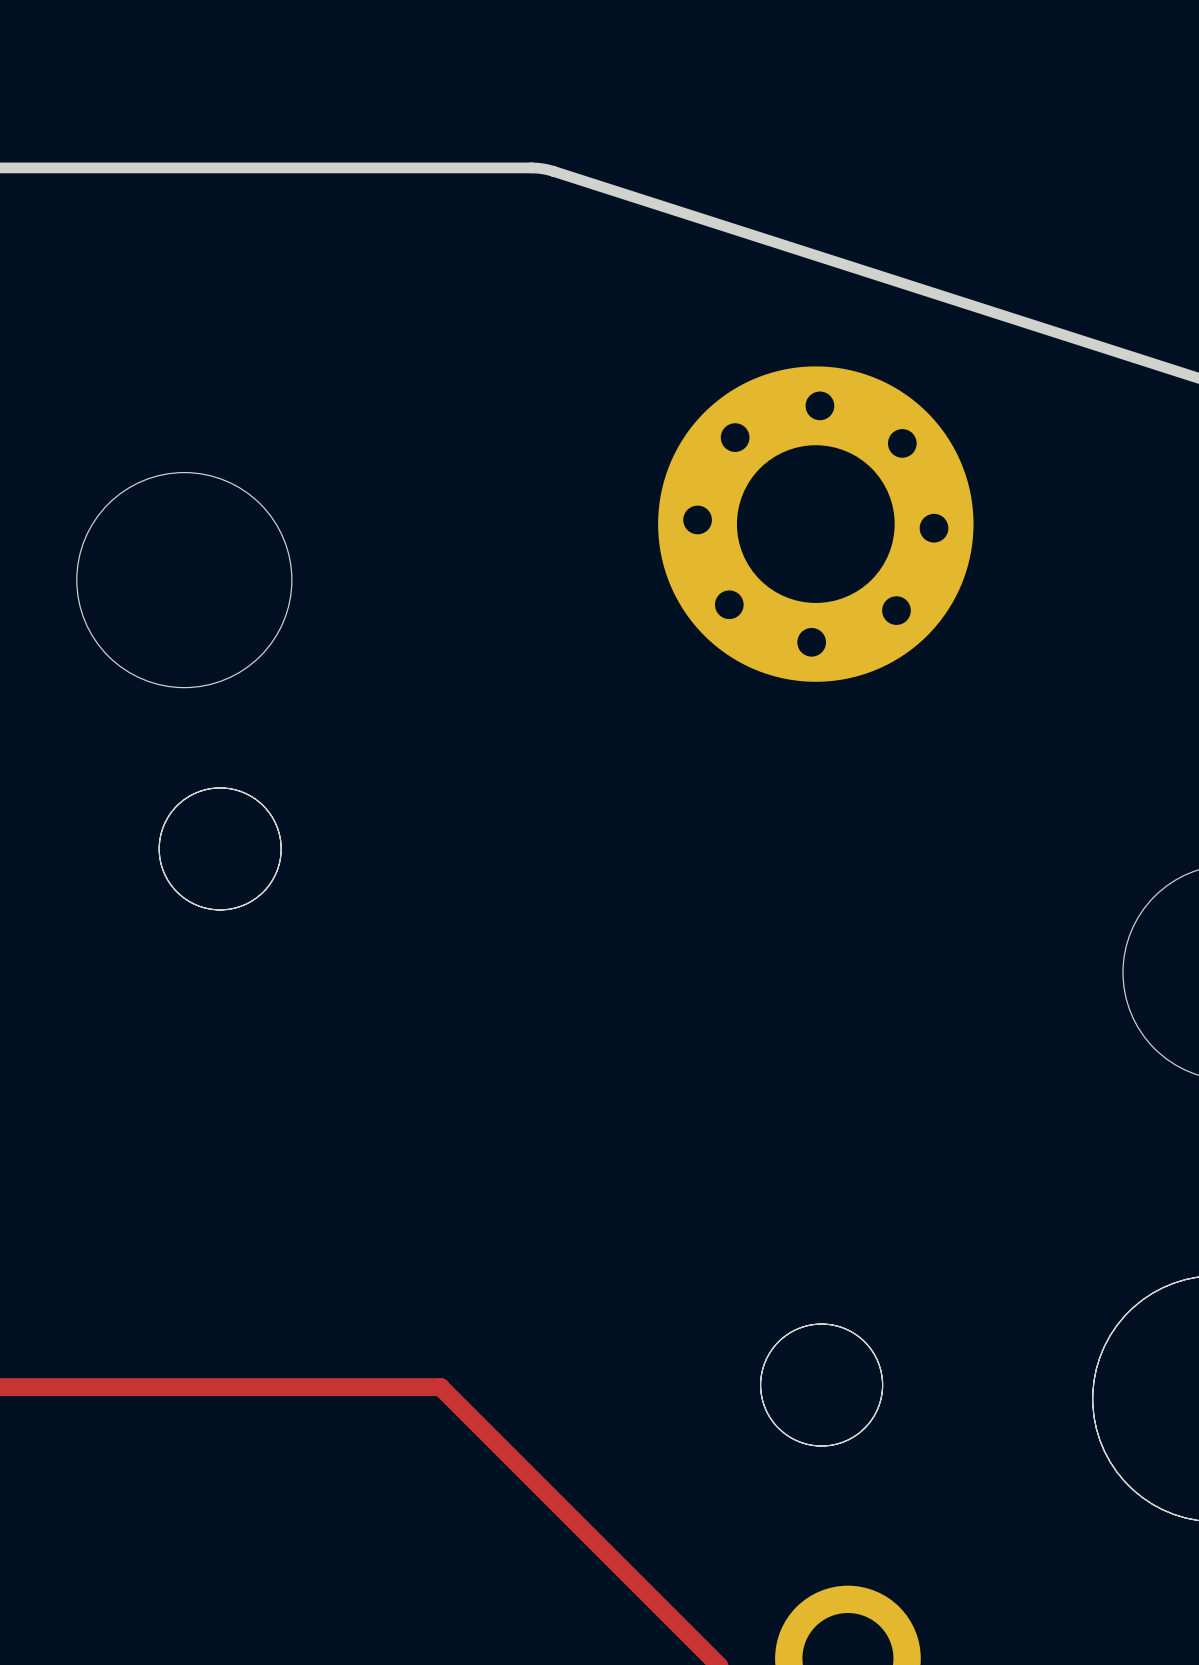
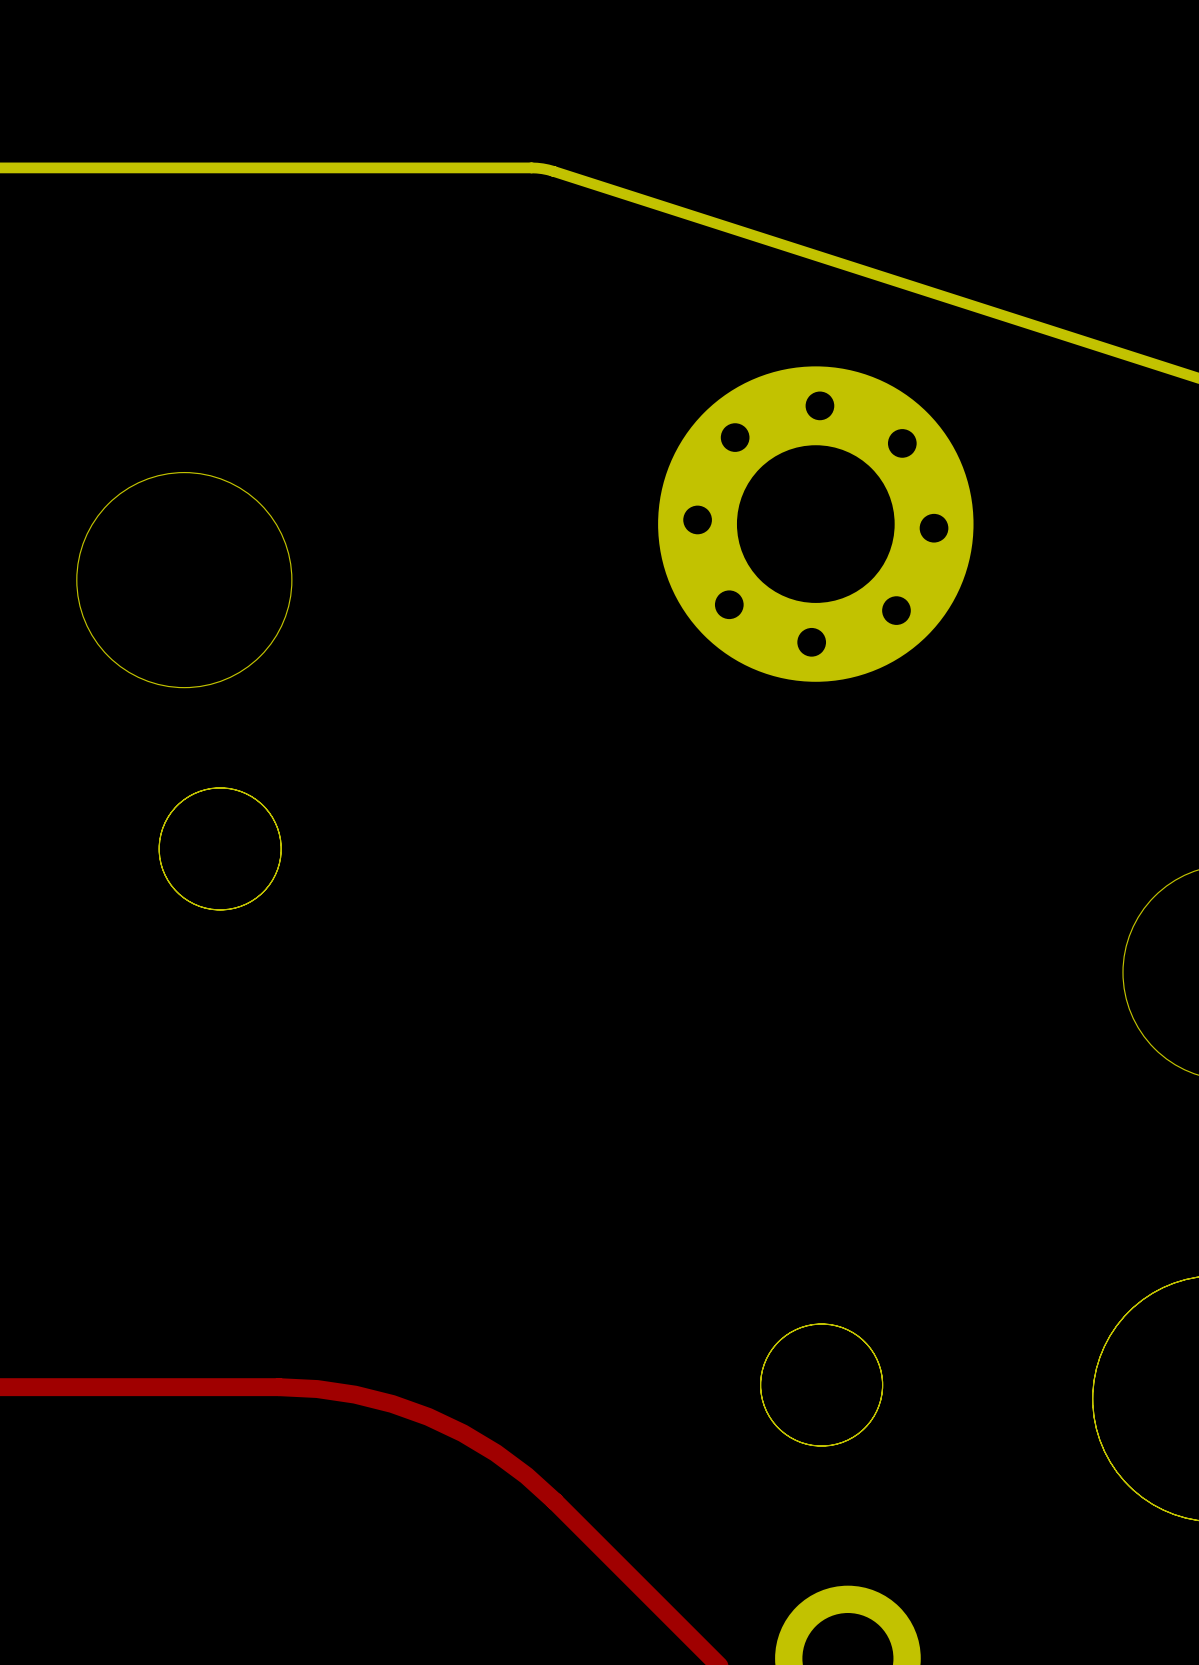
track: (279, 1387) (440, 1387) (554, 1501) -> (279, 1387) (317, 1389) (355, 1394) (392, 1403) (428, 1416) (462, 1433) (495, 1452) (526, 1475) (554, 1501)

